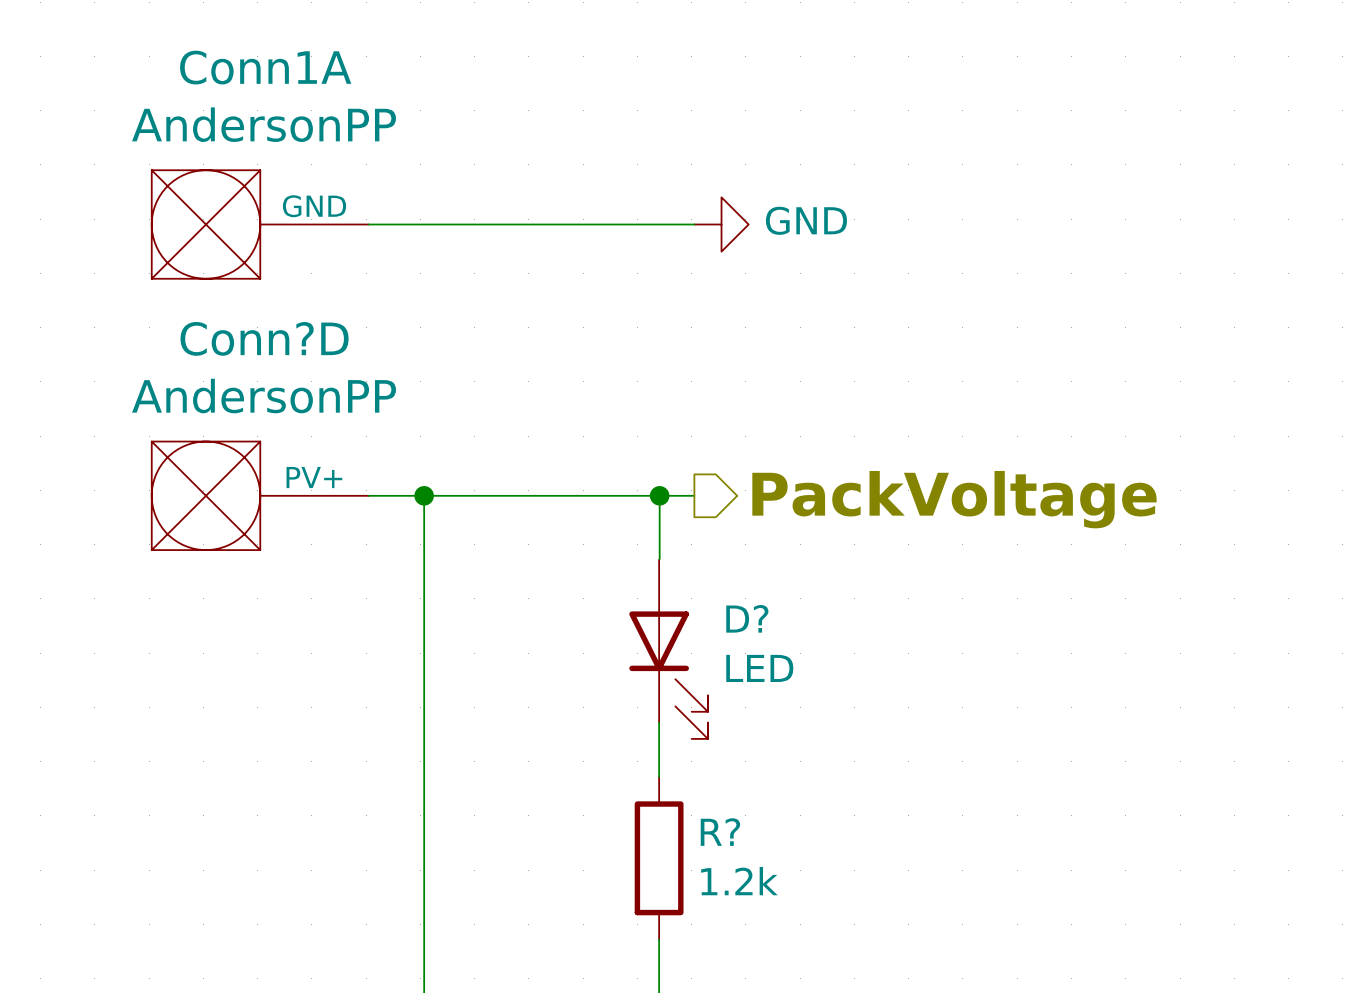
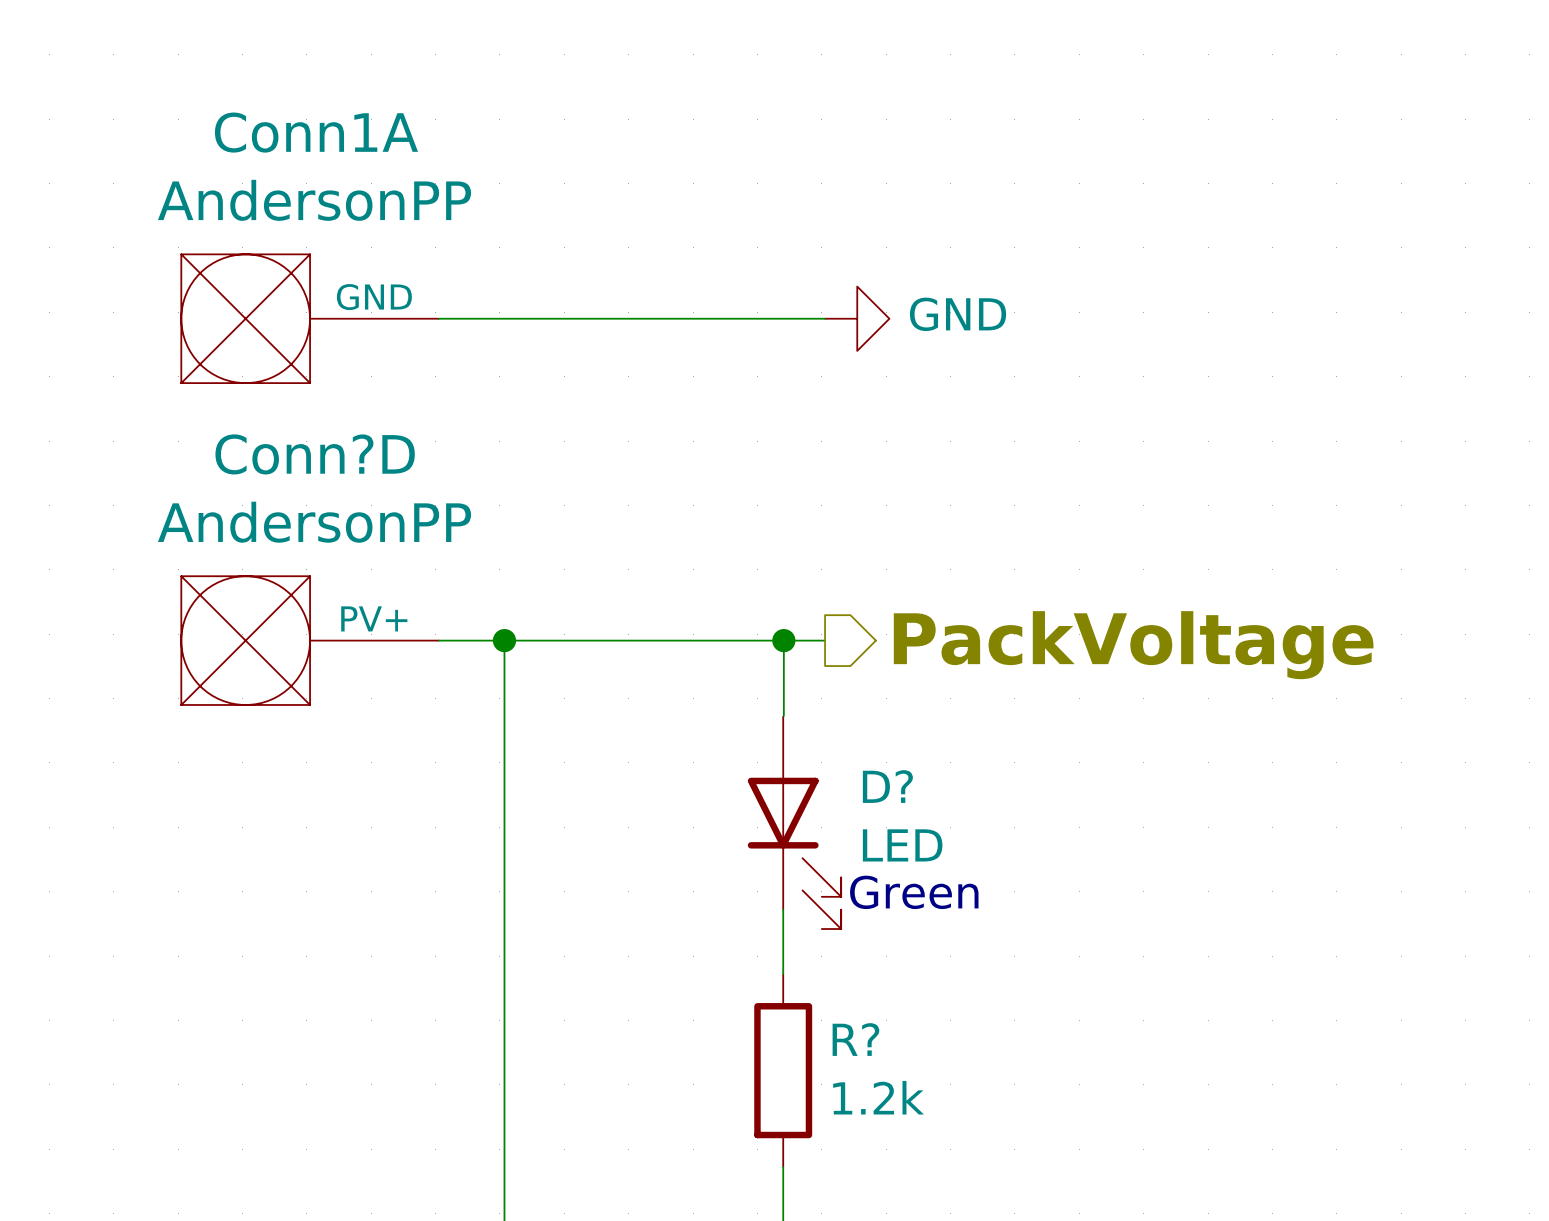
text: none -> Green (914, 892)

